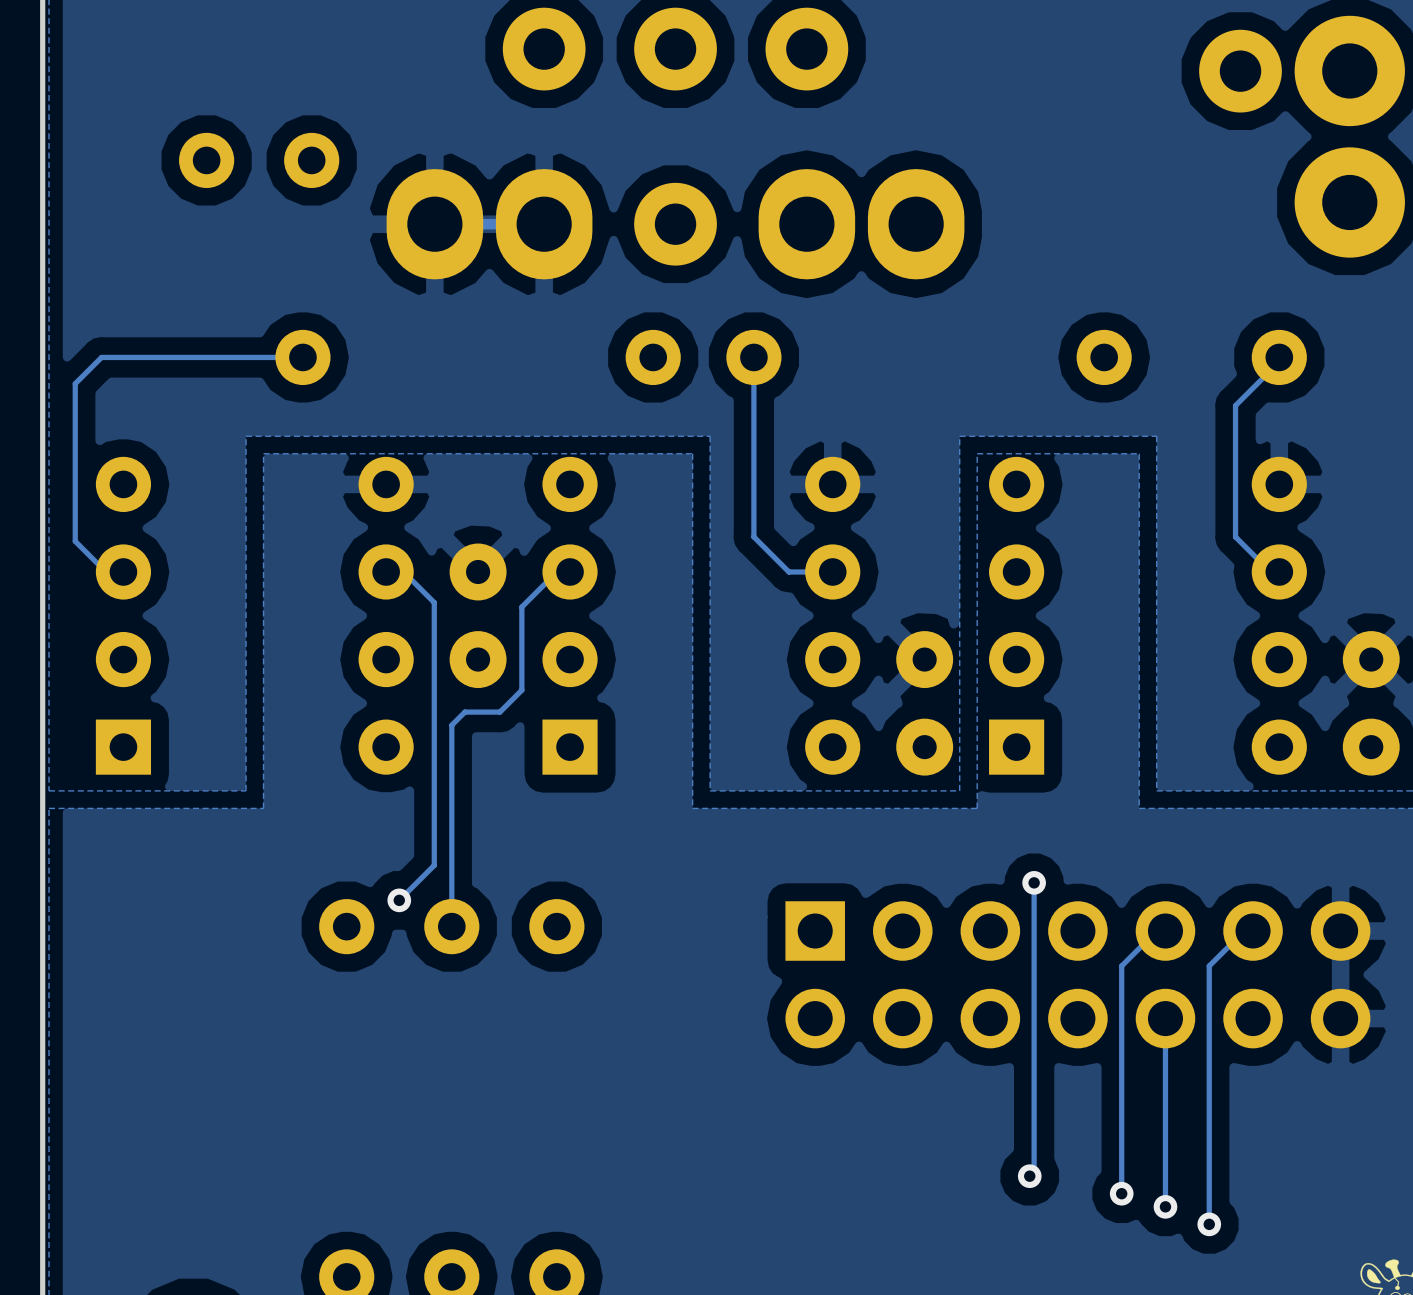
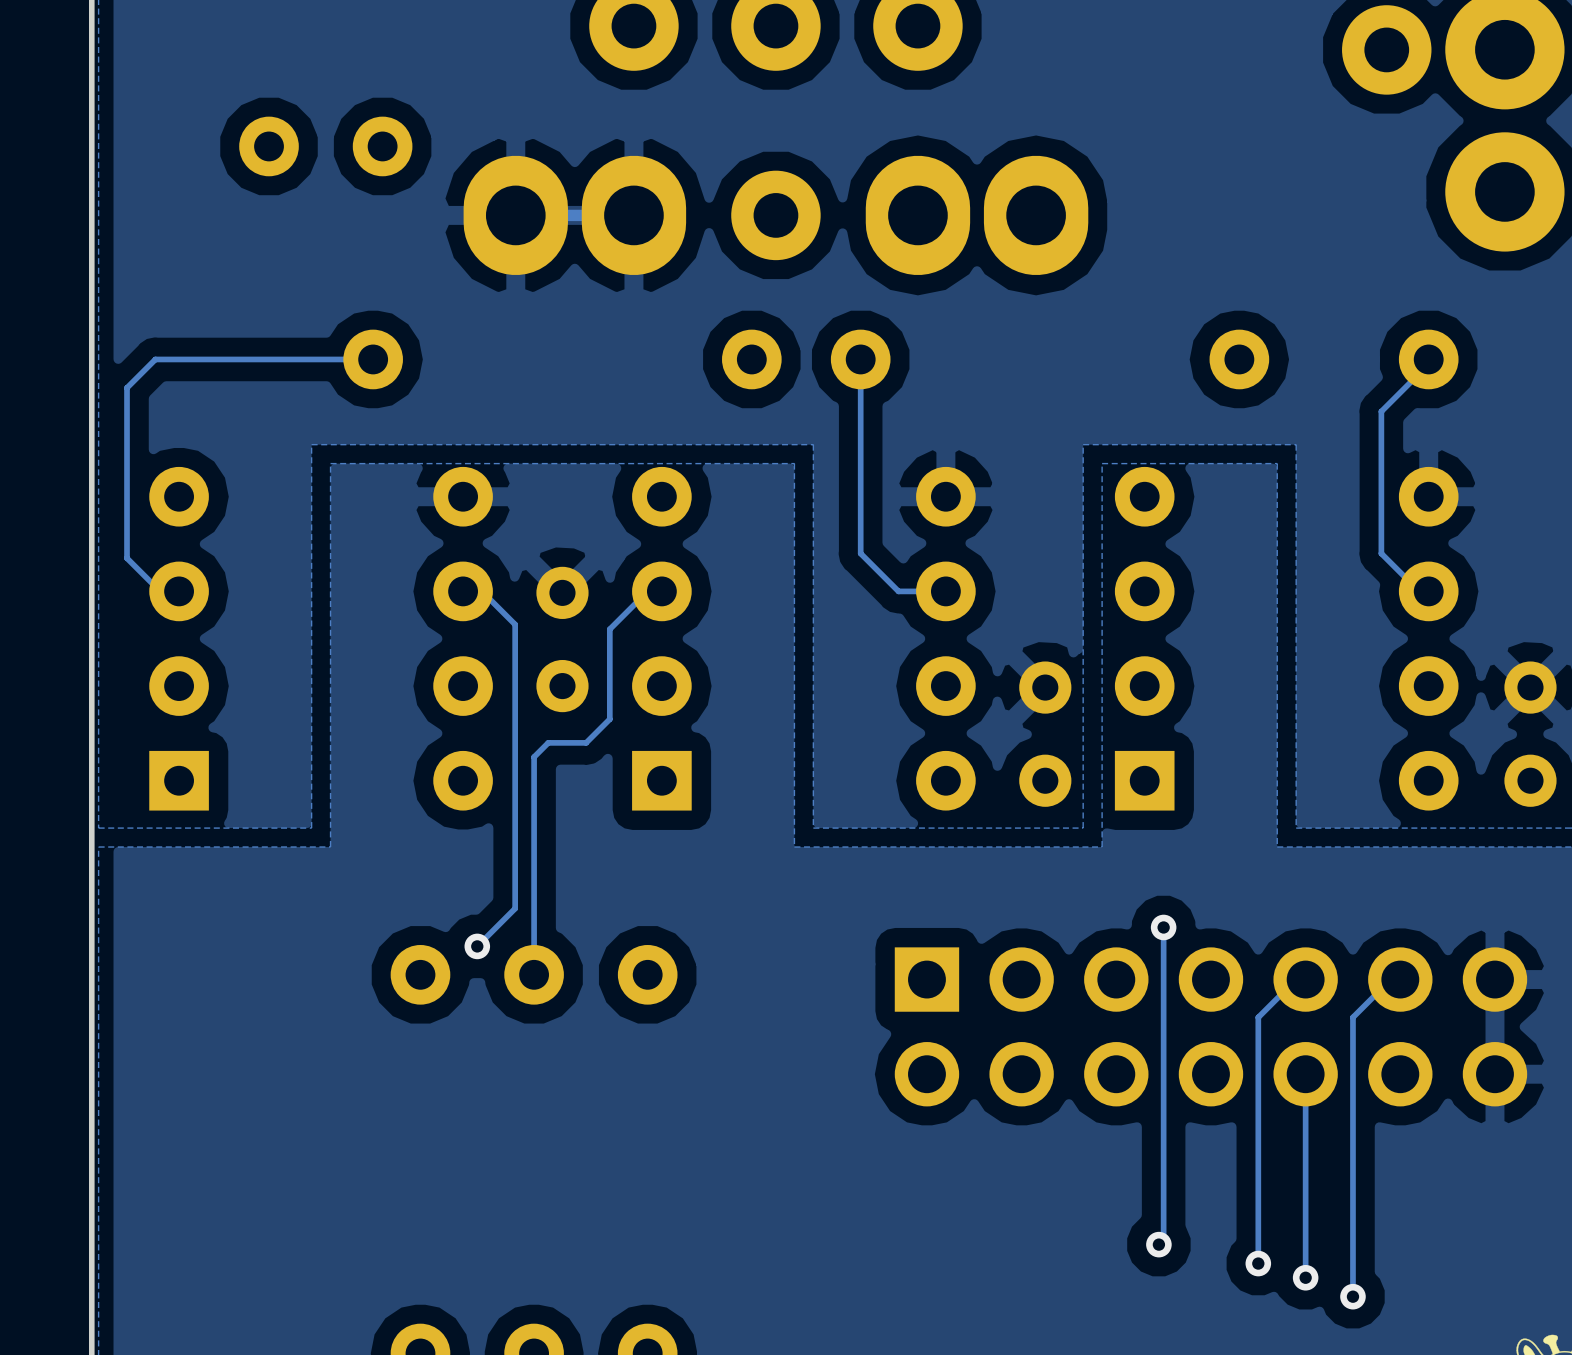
part footprint: [449, 543, 507, 689] -> [536, 566, 589, 713]
part footprint: [896, 631, 954, 776] -> [1019, 661, 1072, 807]
part footprint: [1342, 631, 1400, 776] -> [1504, 661, 1557, 807]

